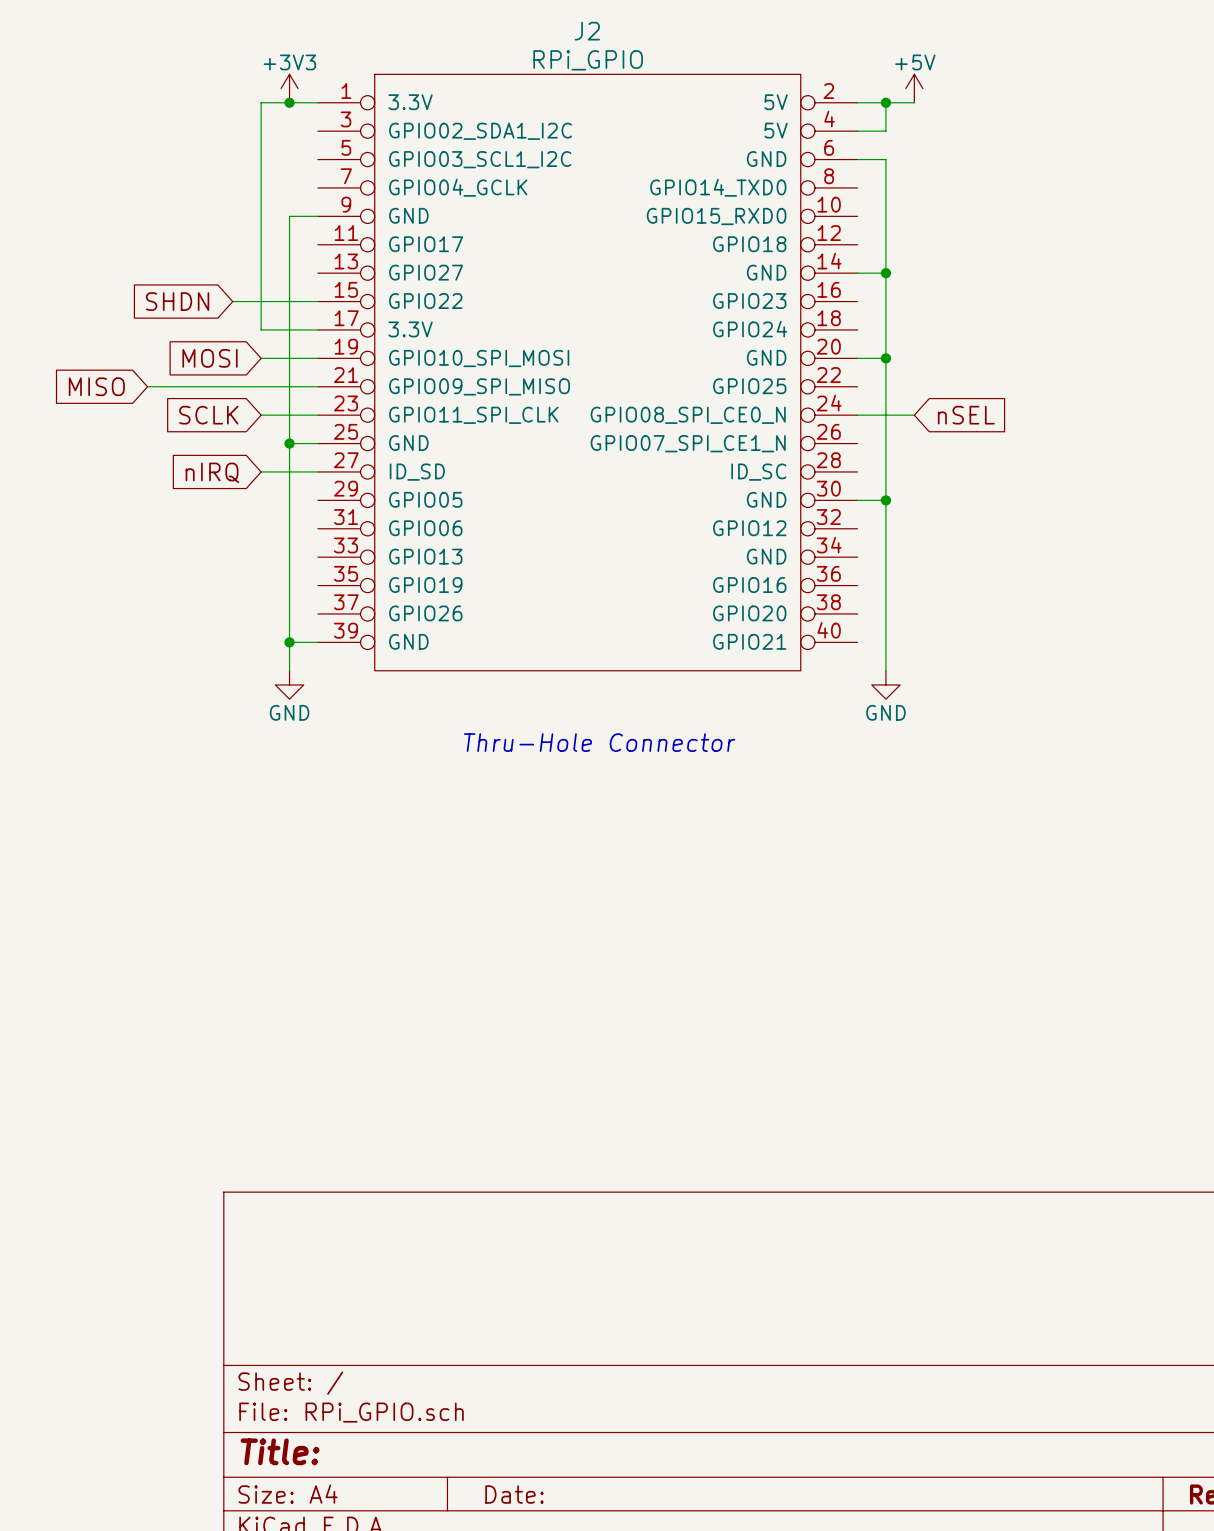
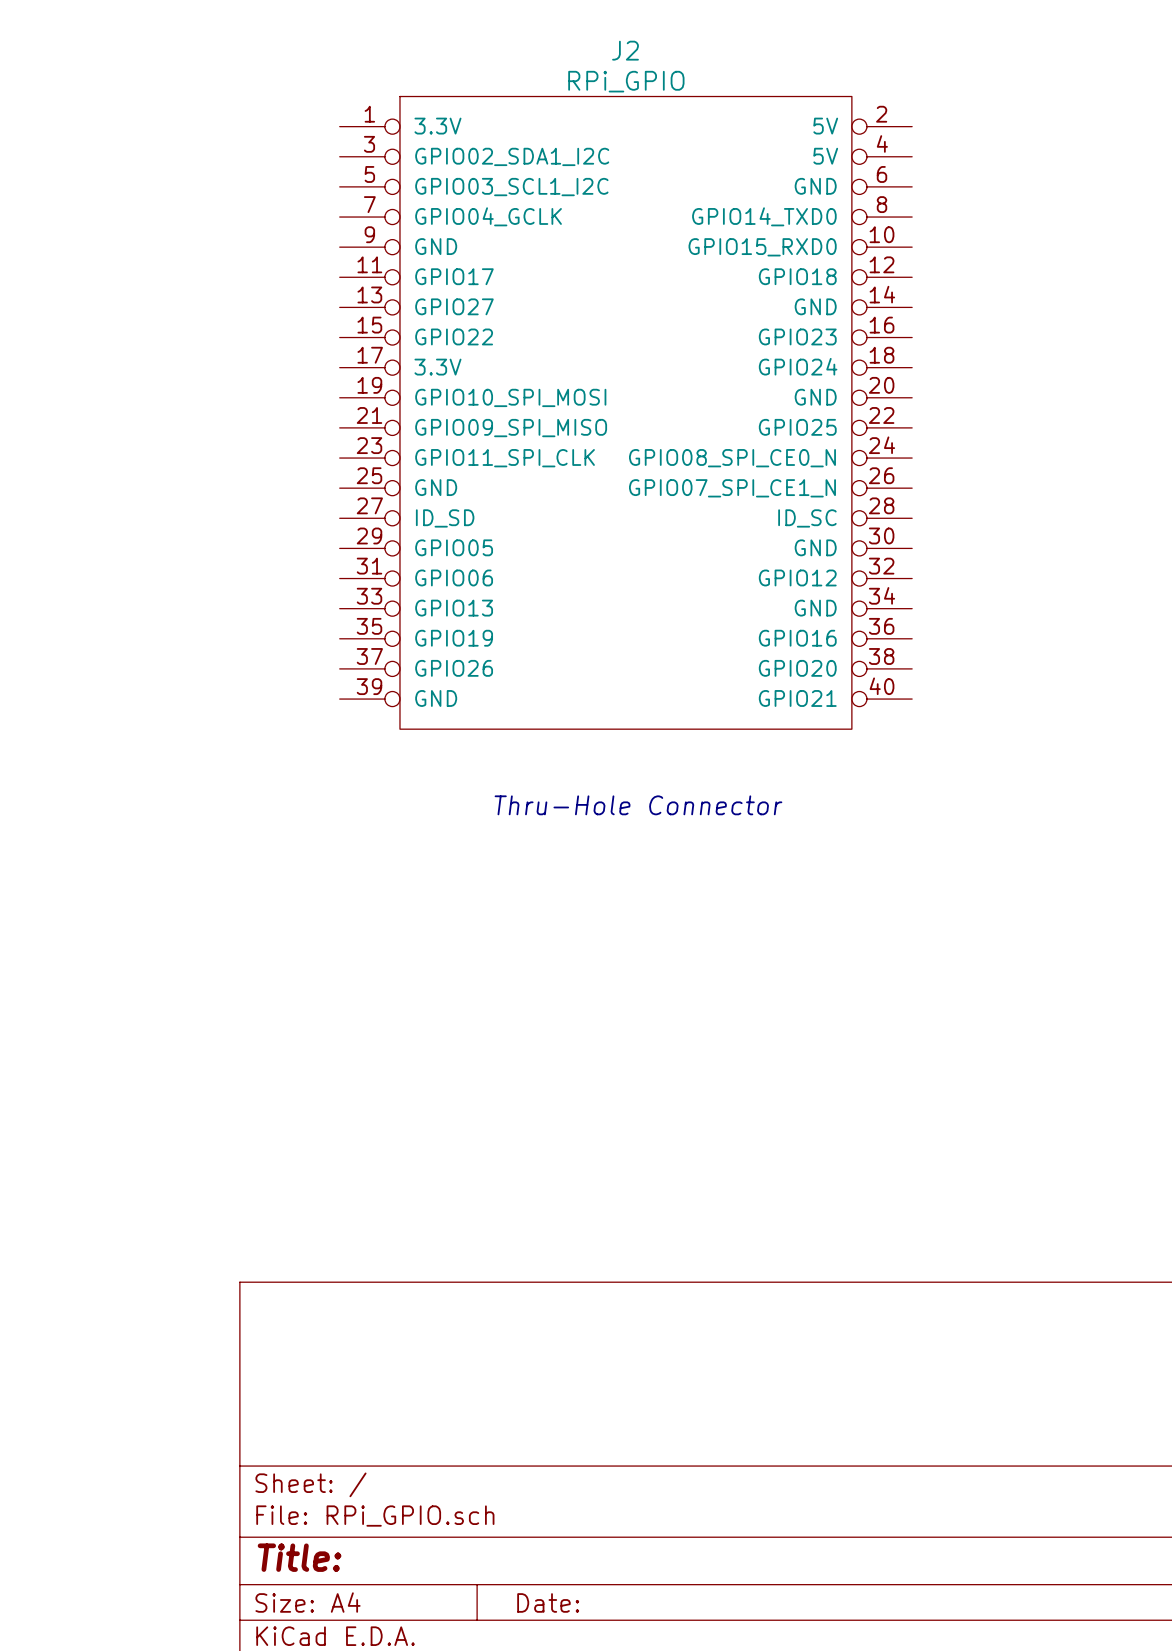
power symbol: +3V3 (289, 88) -> none
power symbol: +5V (914, 88) -> none
junction: (289, 102) -> none
wire: (317, 102) (261, 102) (261, 329) (317, 329) -> none
wire: (857, 102) (914, 102) -> none
wire: (885, 102) (885, 131) (857, 131) -> none
junction: (885, 102) -> none
wire: (857, 159) (885, 159) (885, 670) -> none
wire: (317, 216) (289, 216) (289, 670) -> none
wire: (857, 273) (885, 273) -> none
junction: (885, 273) -> none
global label: SHDN (177, 301) -> none
wire: (232, 301) (317, 301) -> none
global label: MOSI (210, 358) -> none
wire: (261, 358) (317, 358) -> none
wire: (857, 358) (885, 358) -> none
junction: (885, 358) -> none
global label: MISO (96, 386) -> none
wire: (147, 386) (317, 386) -> none
global label: SCLK (208, 415) -> none
wire: (261, 415) (317, 415) -> none
wire: (857, 415) (914, 415) -> none
global label: nSEL (966, 415) -> none
wire: (289, 443) (317, 443) -> none
junction: (289, 443) -> none
wire: (261, 471) (317, 471) -> none
global label: nIRQ (212, 472) -> none
wire: (857, 500) (885, 500) -> none
junction: (885, 500) -> none
wire: (289, 642) (317, 642) -> none
junction: (289, 642) -> none
power symbol: GND (289, 684) -> none
power symbol: GND (885, 684) -> none

